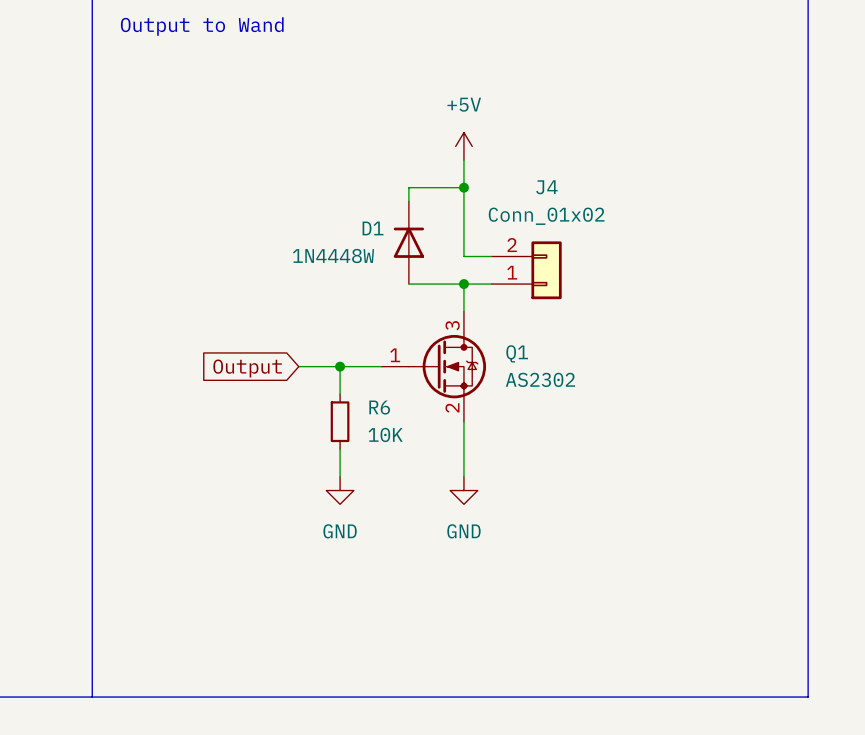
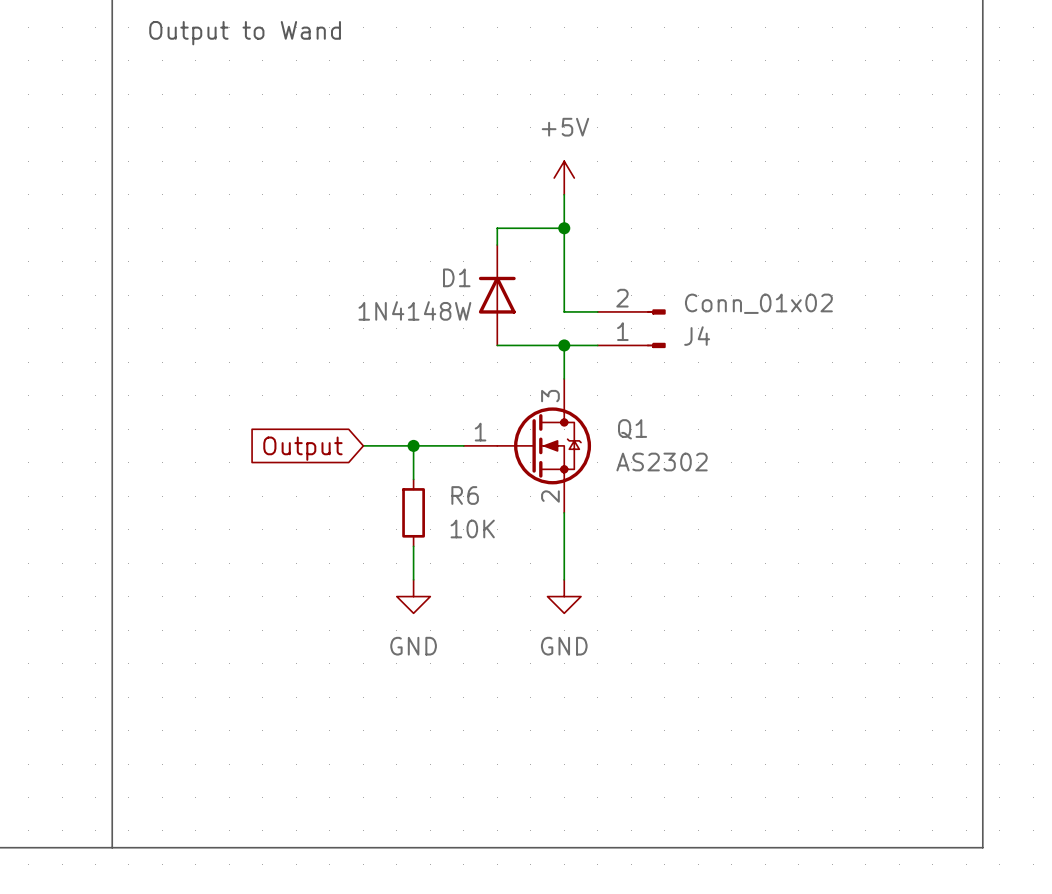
J4 name position: J4 (546, 187) -> J4 (697, 336)
J4 value position: Conn_01x02 (546, 216) -> Conn_01x02 (758, 303)
J4 symbol: [491, 241, 562, 300] -> [597, 309, 666, 349]
D1 value: 1N4448W (333, 256) -> 1N4148W (414, 310)

